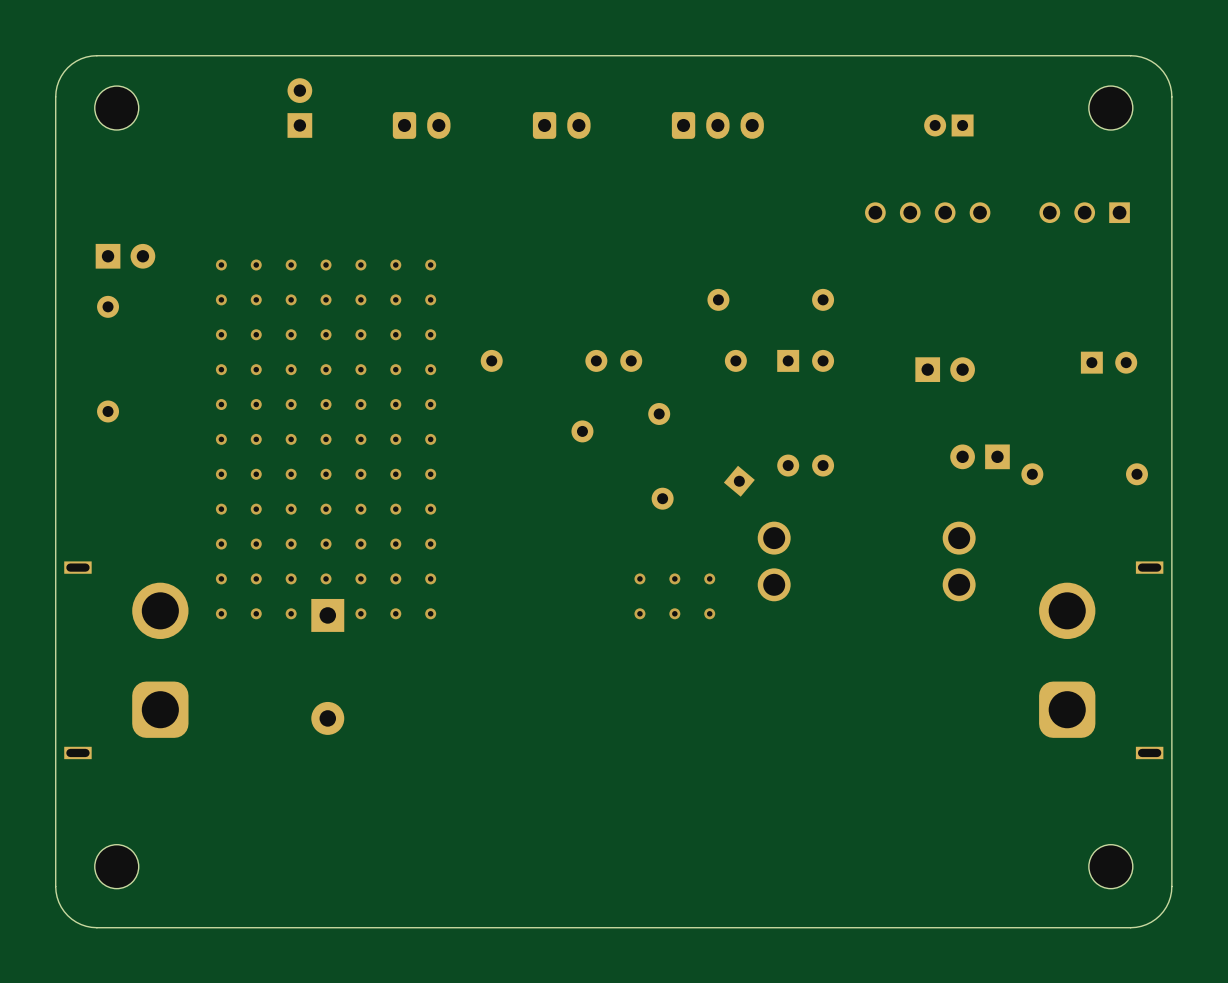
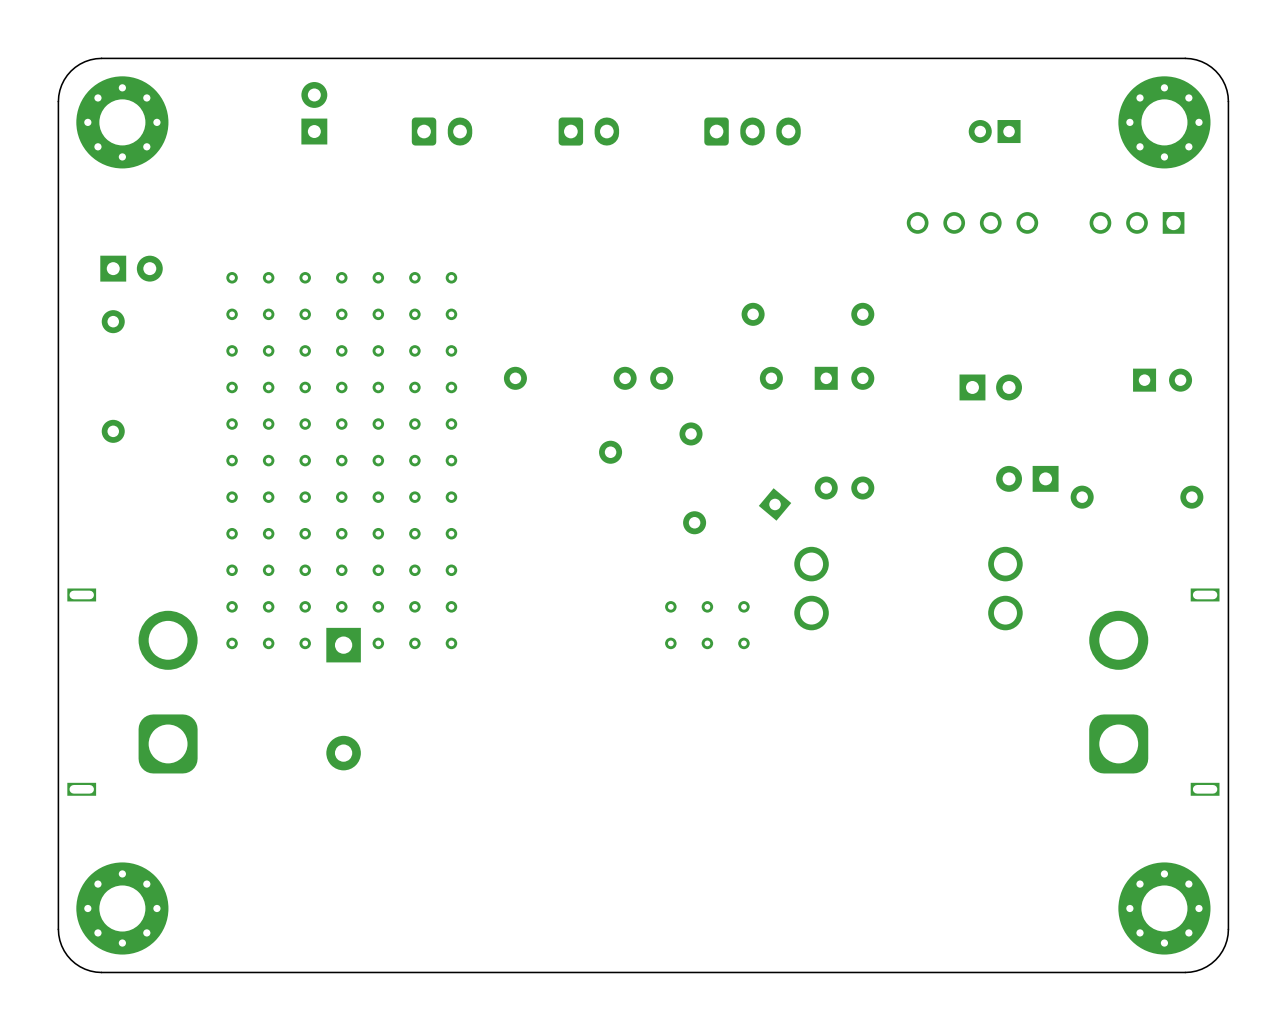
part footprint: [94, 86, 139, 131] -> [76, 76, 169, 169]
part footprint: [1088, 86, 1133, 131] -> [1118, 76, 1211, 169]
part footprint: [94, 844, 139, 889] -> [76, 862, 169, 955]
part footprint: [1088, 844, 1133, 889] -> [1118, 862, 1211, 955]

